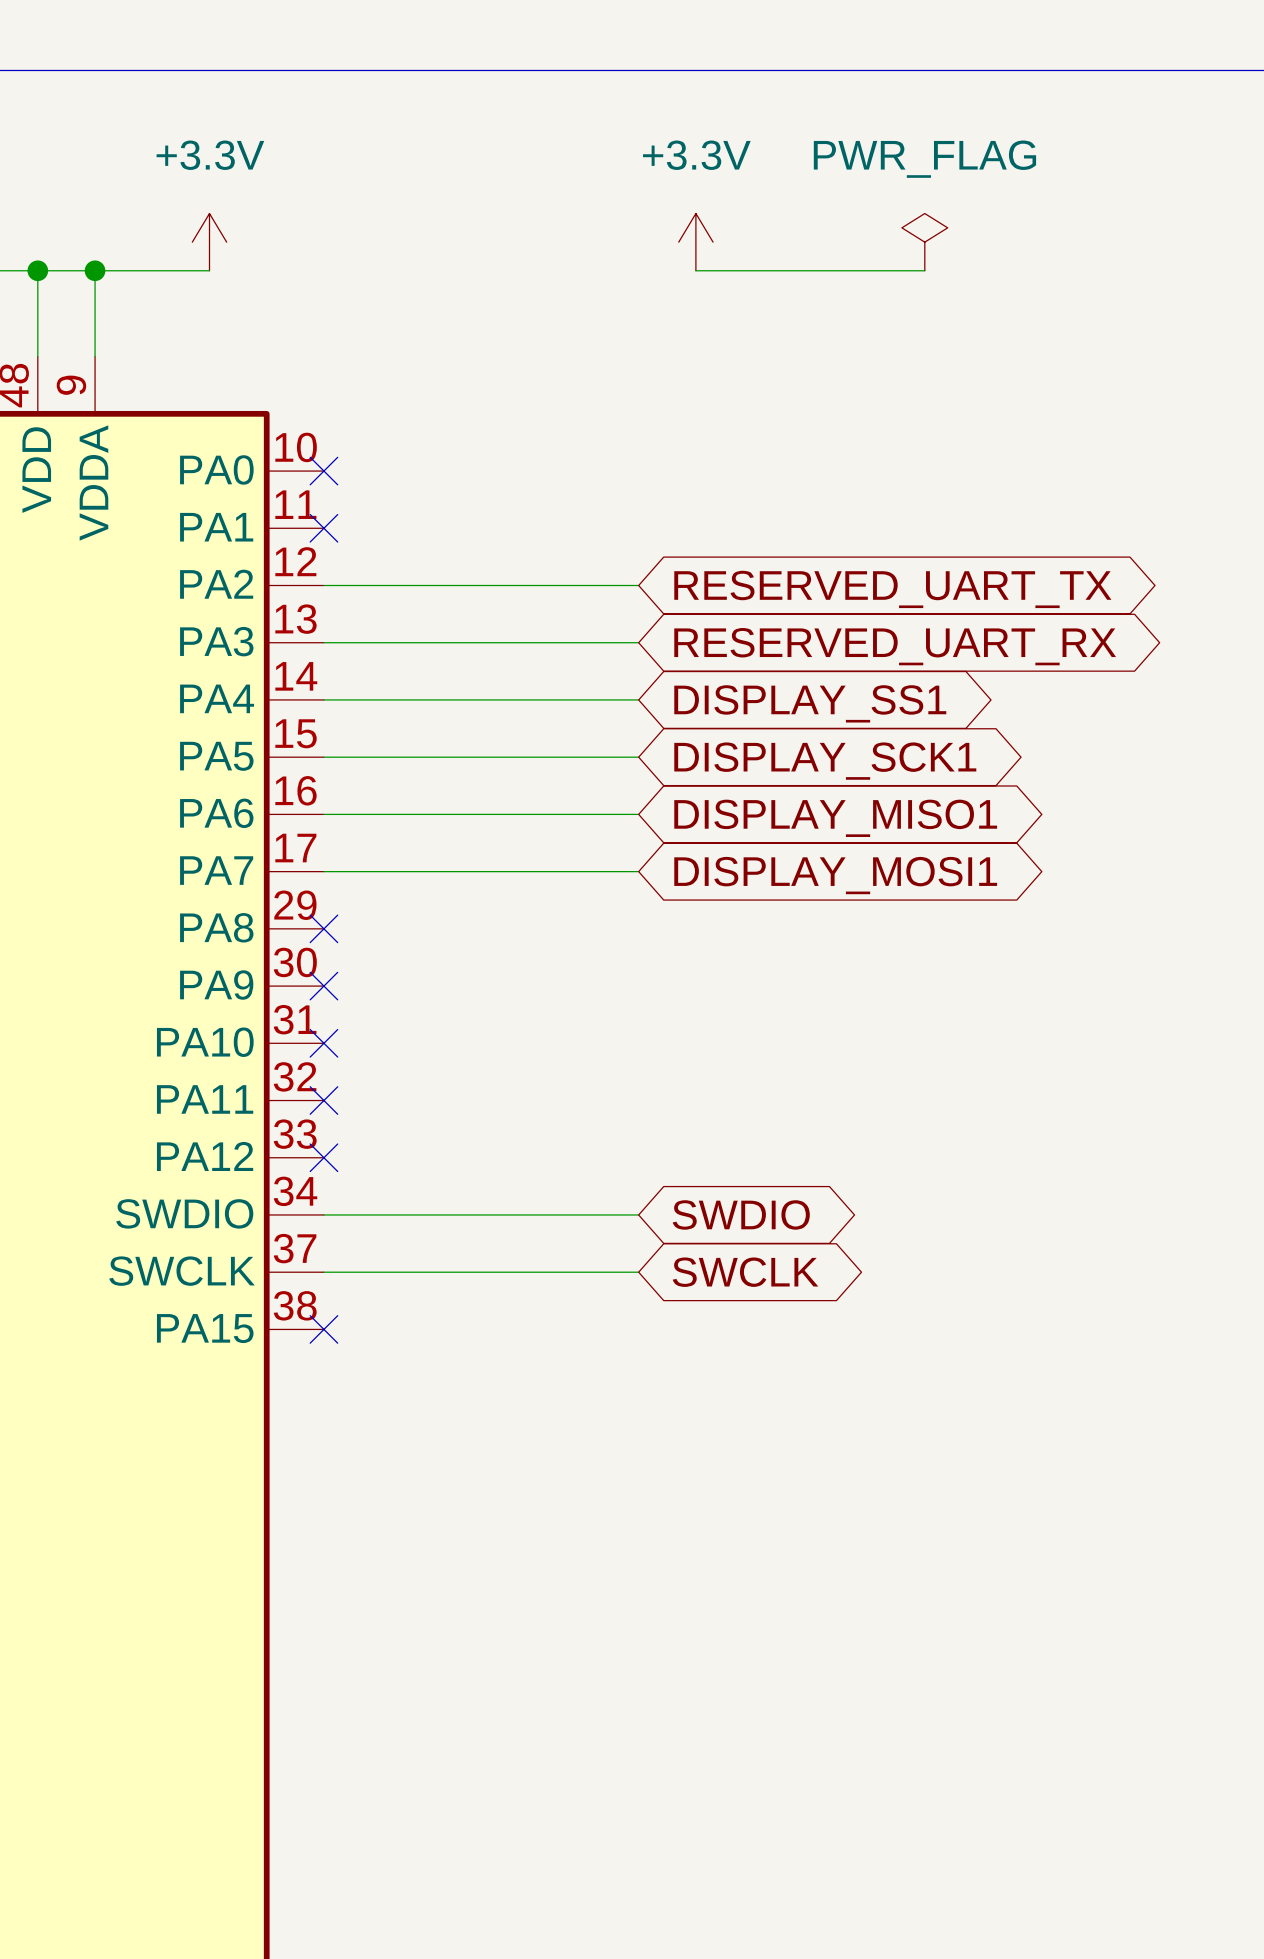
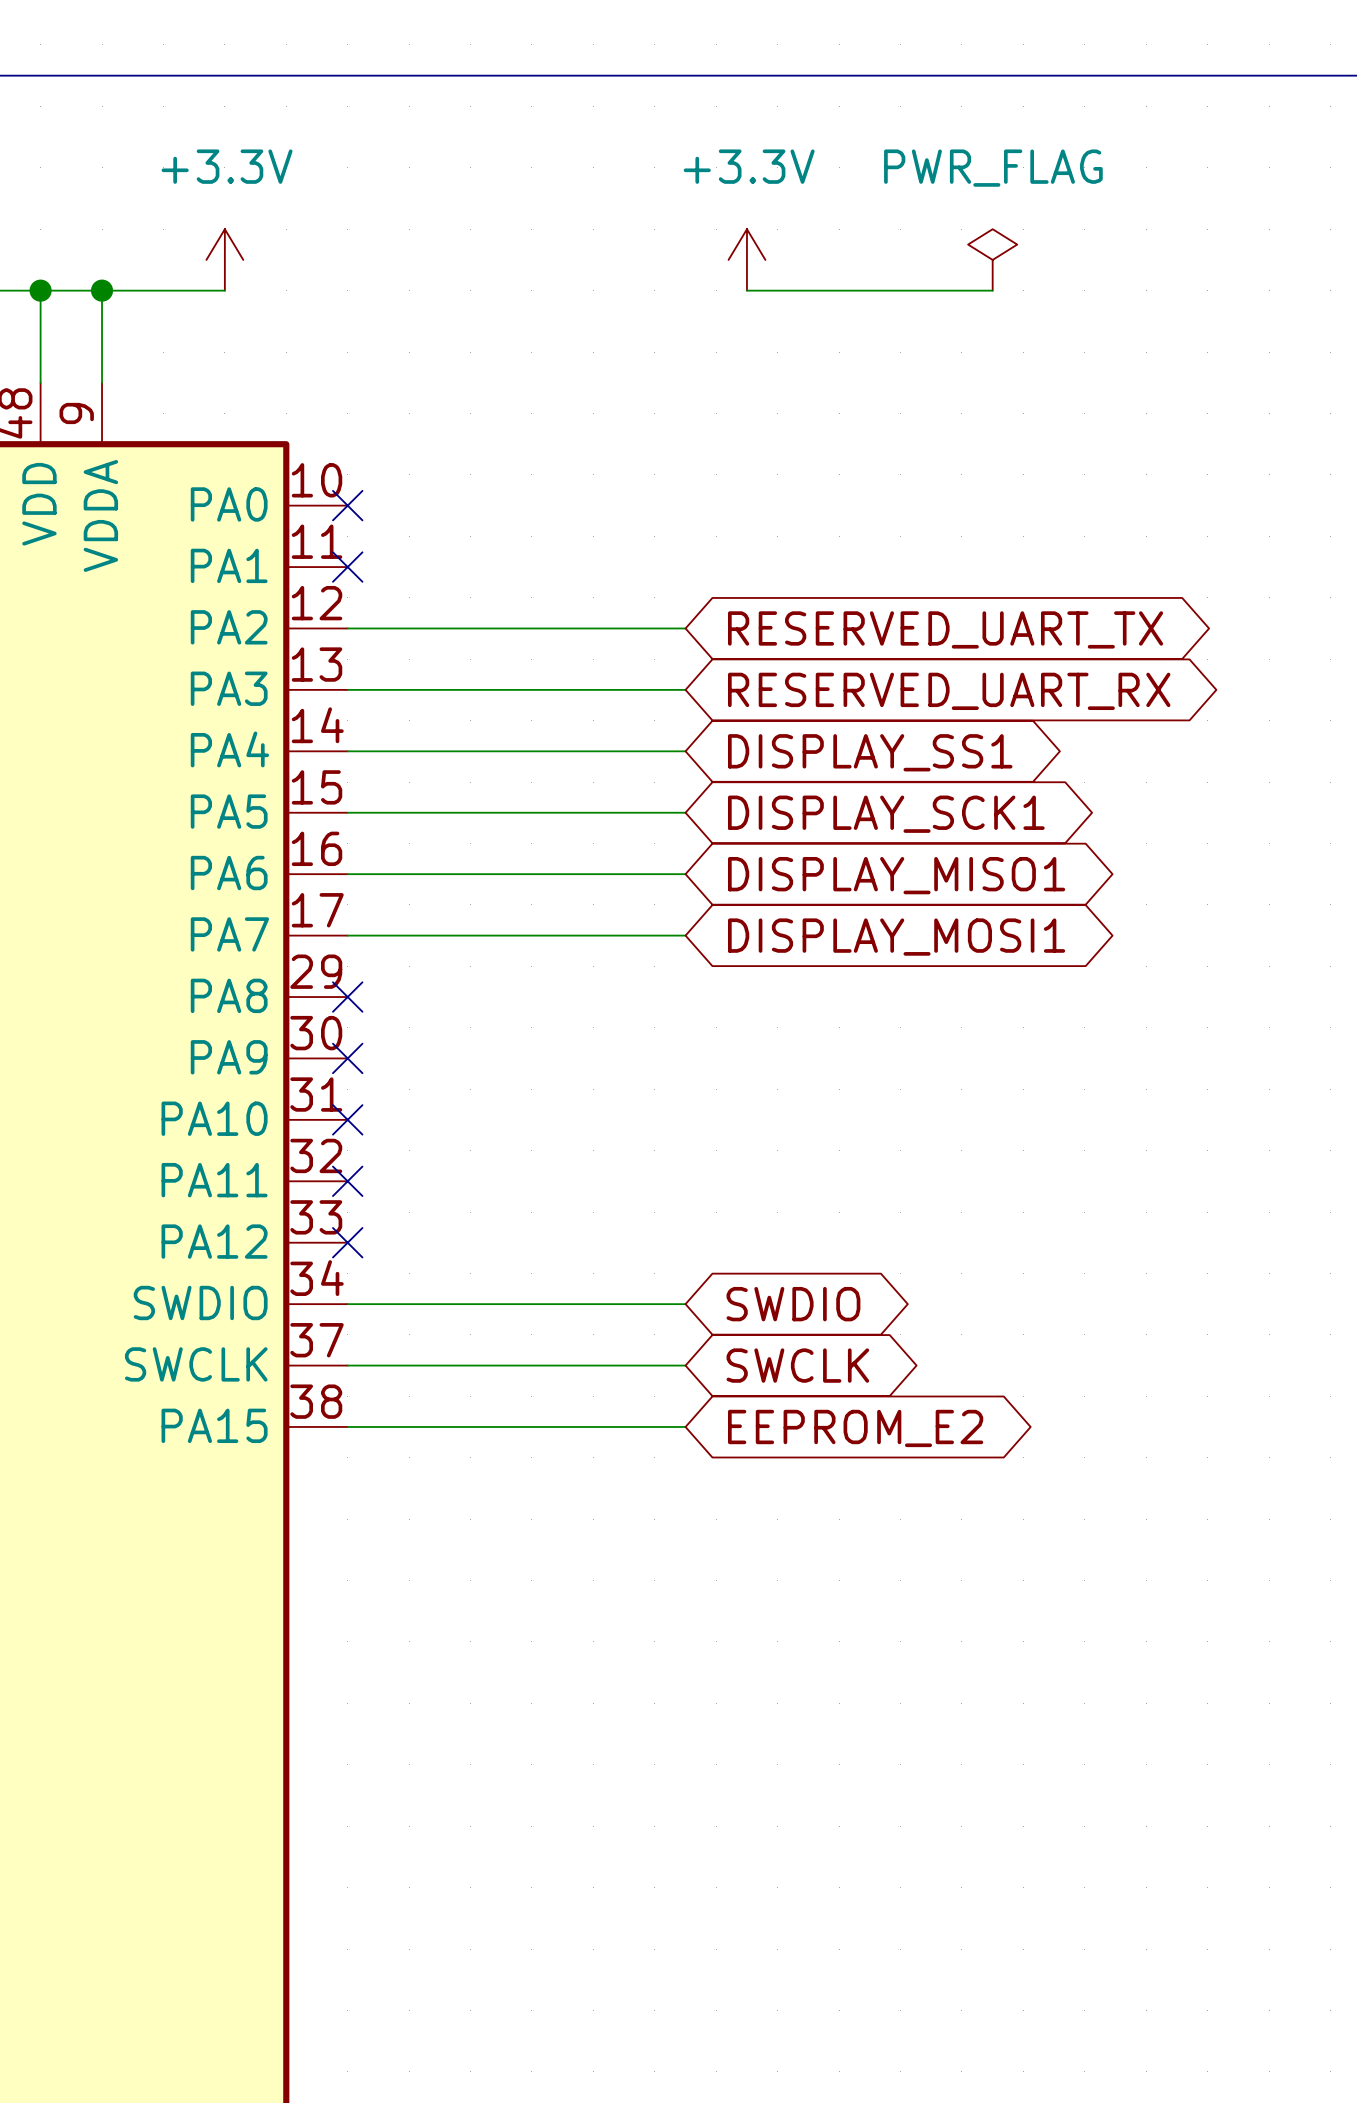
wire: none -> (347, 1426) (685, 1426)
no-connect mark: (323, 1329) -> none
global label: none -> EEPROM_E2 (855, 1428)

